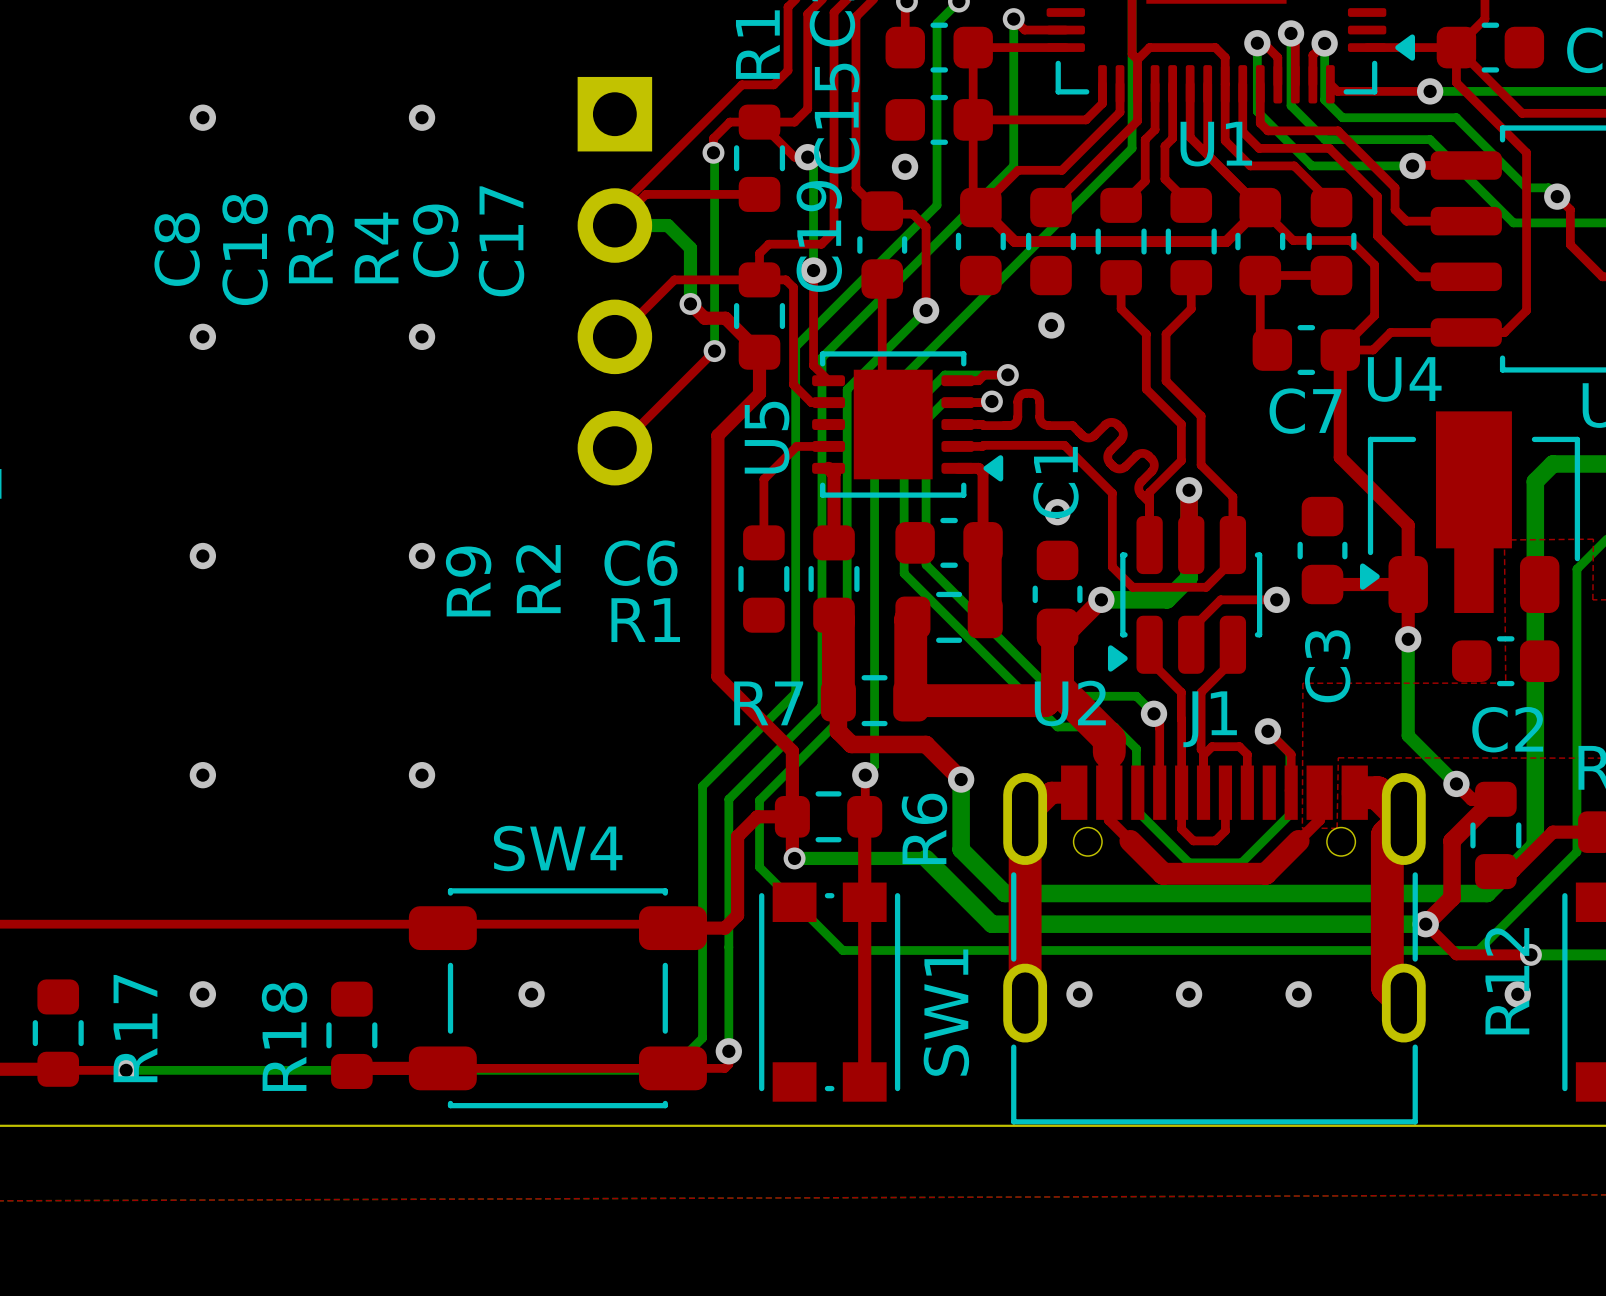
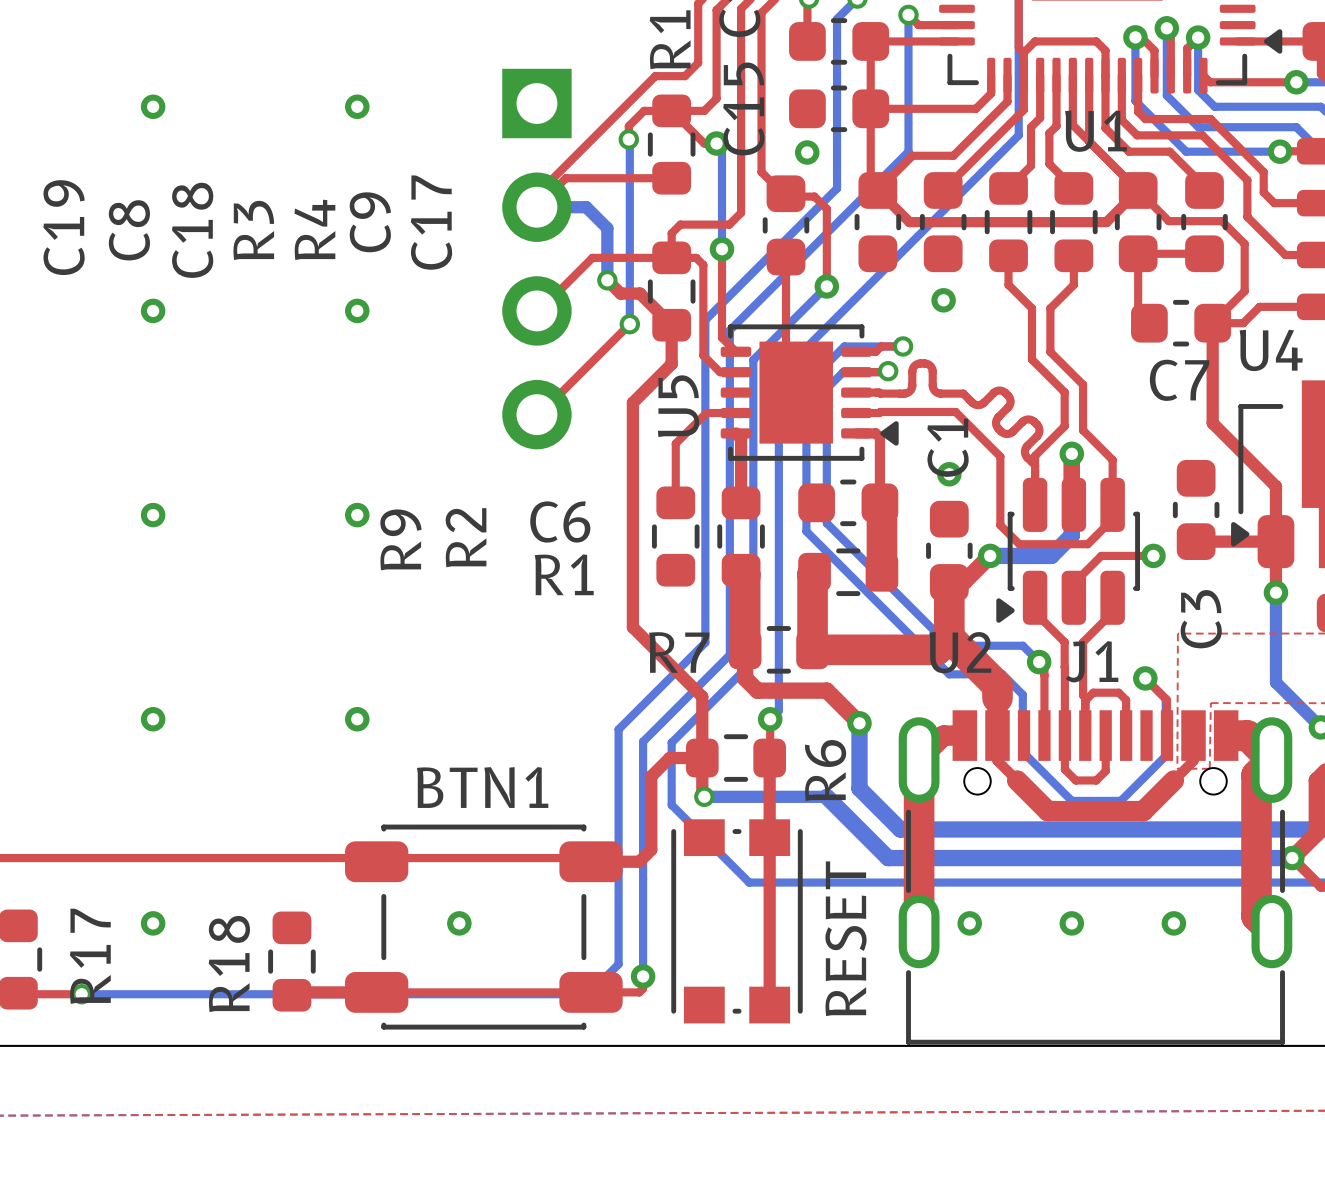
C19 name position: C19 (819, 236) -> C19 (64, 227)
SW4 name: SW4 (558, 848) -> BTN1 (482, 787)
SW1 name: SW1 (946, 1012) -> RESET (845, 938)

